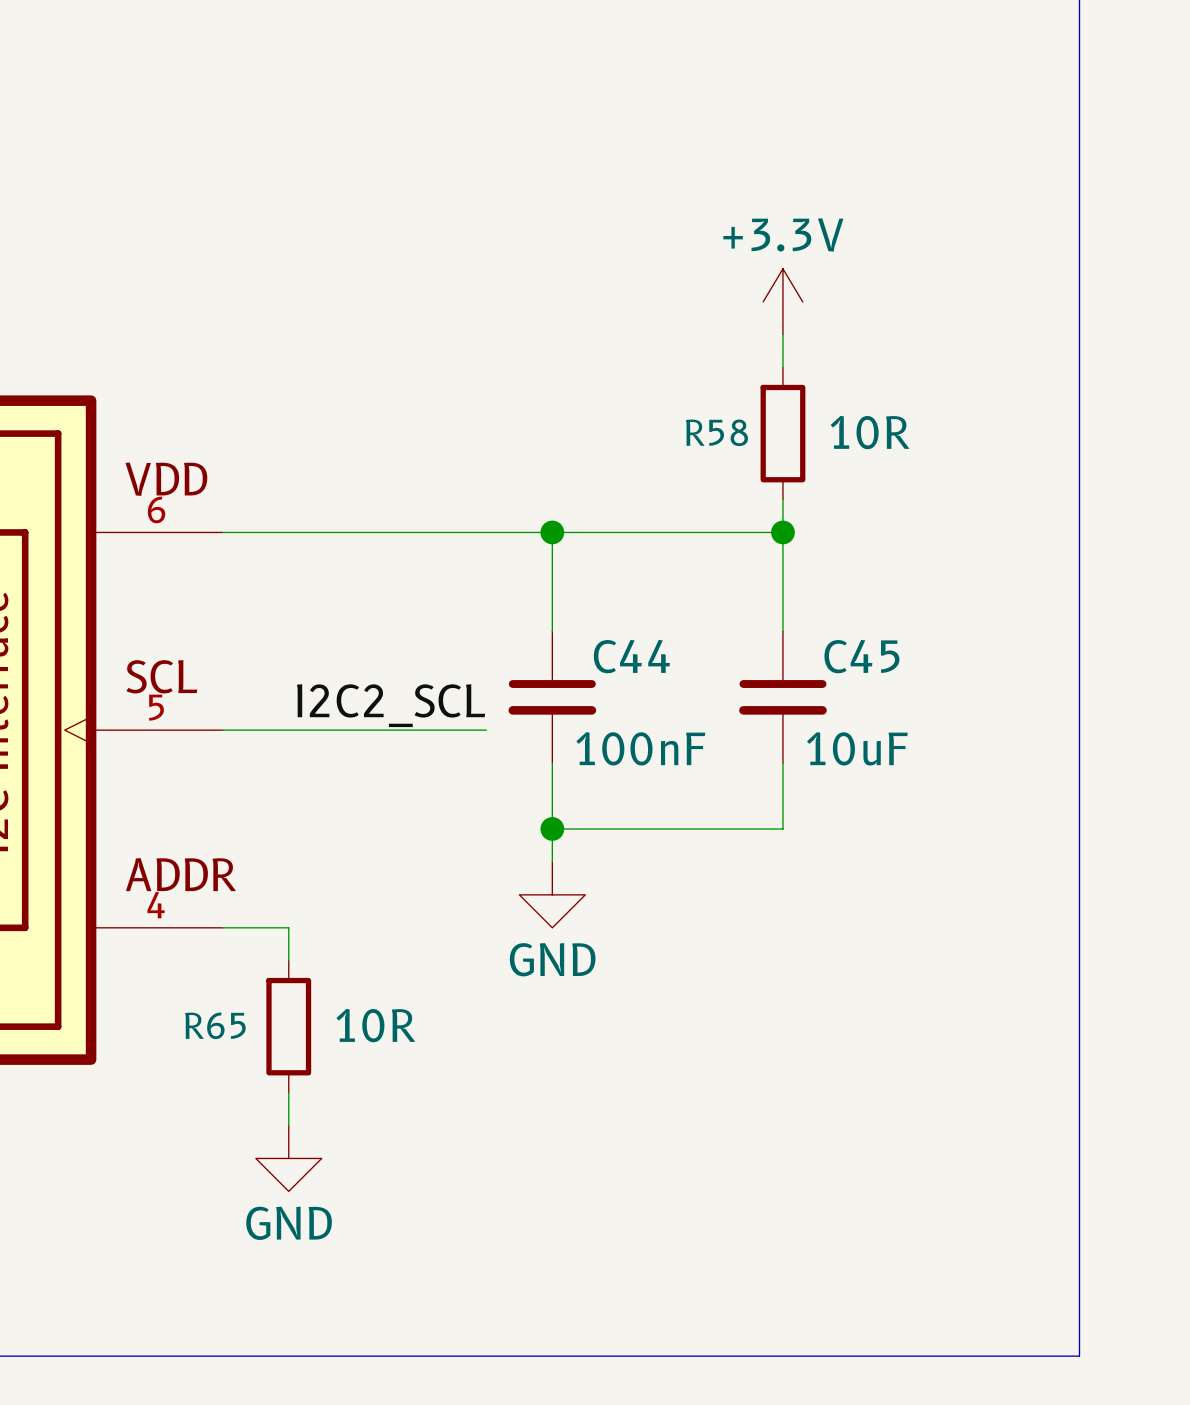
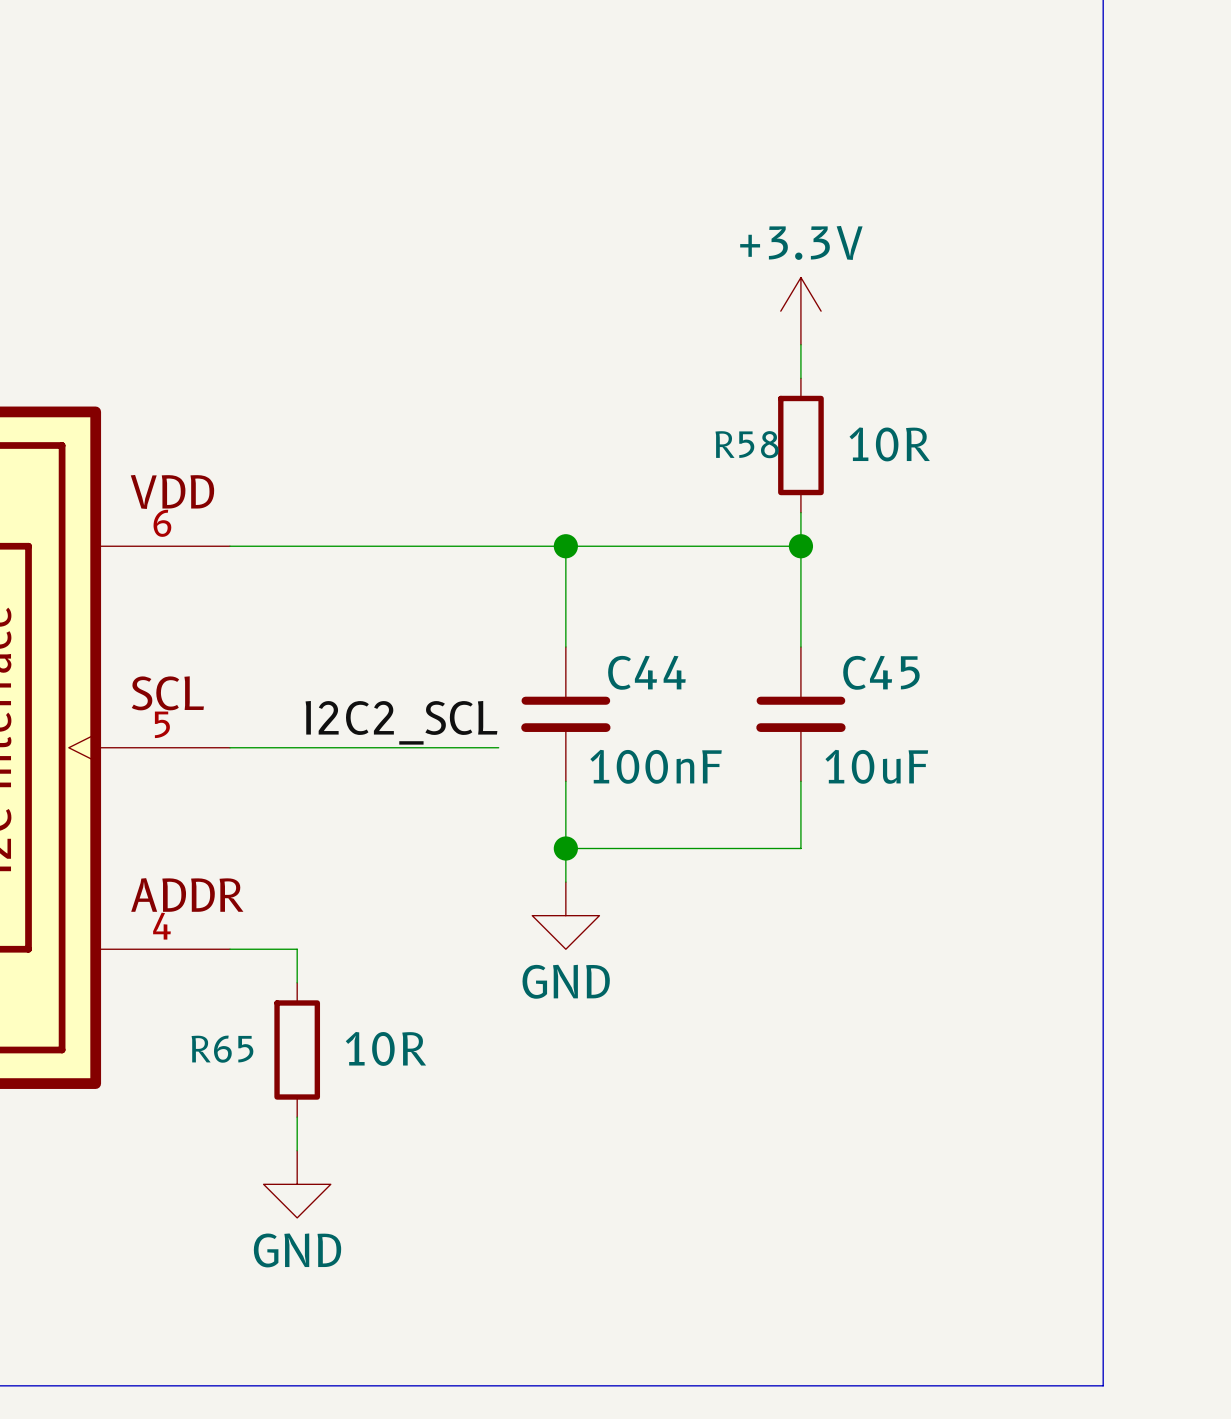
R58 name position: R58 (716, 432) -> R58 (747, 444)

